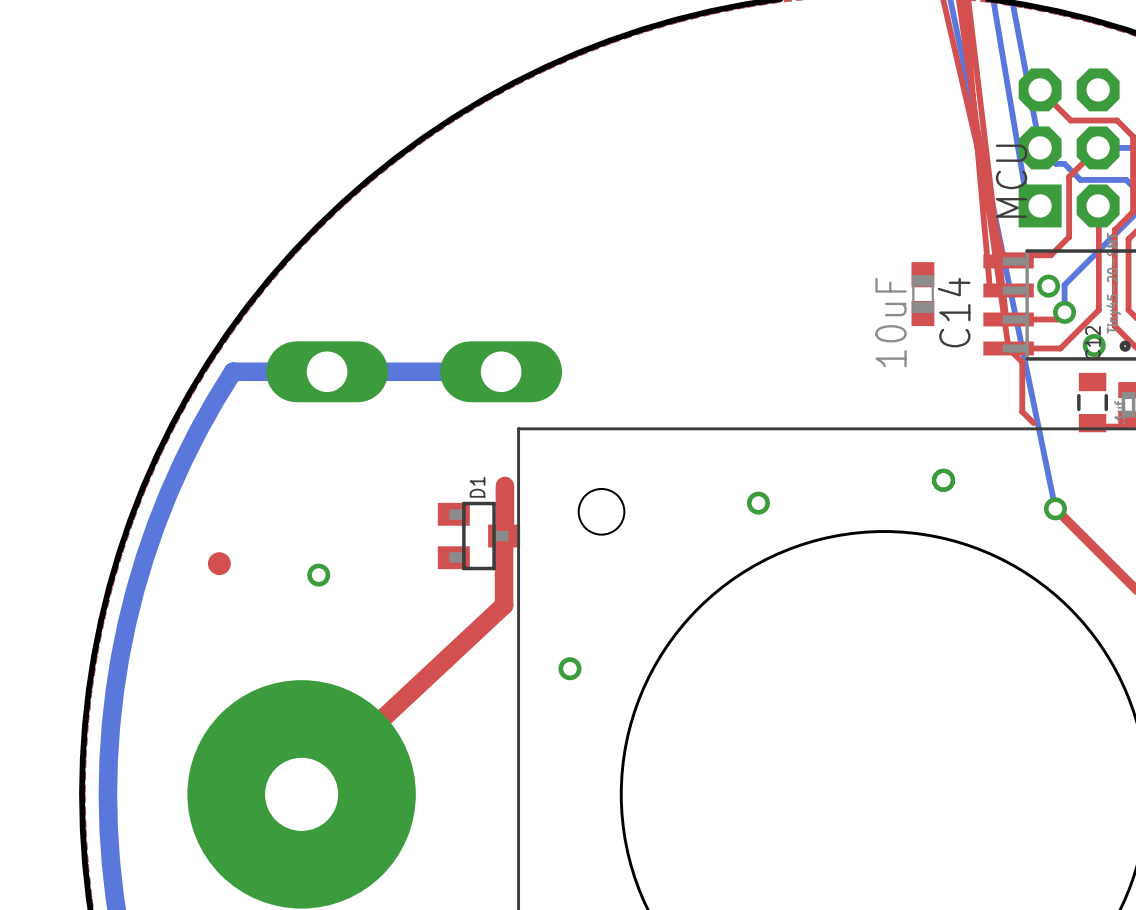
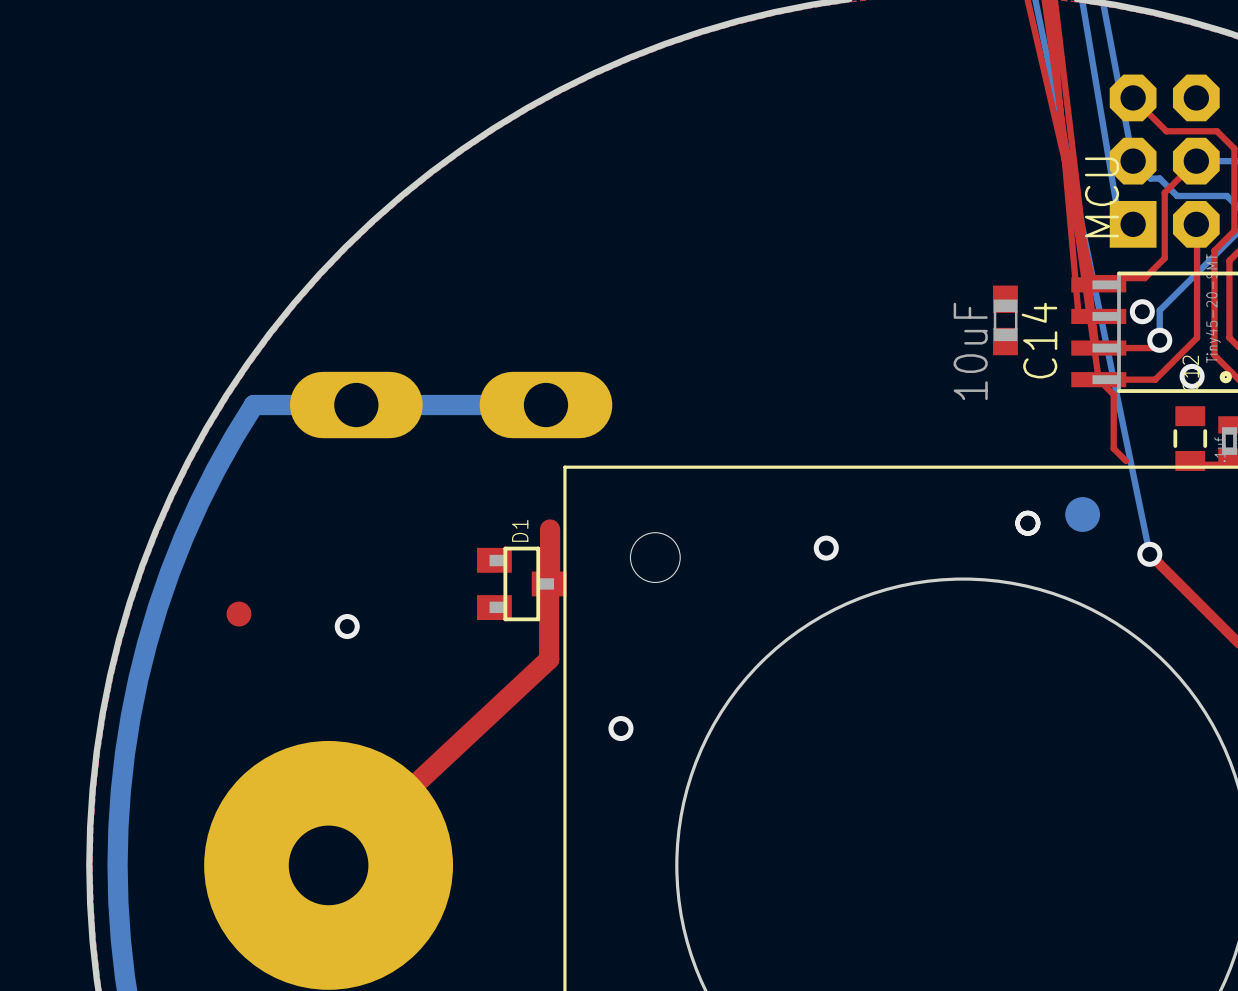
part: none -> (1082, 514)

